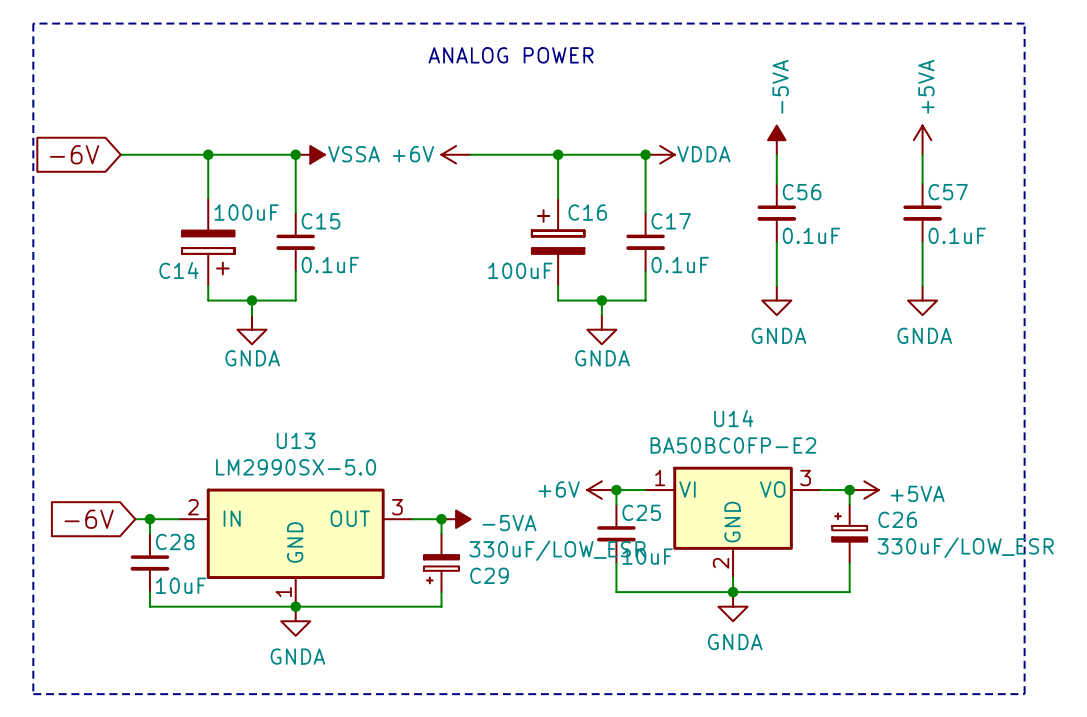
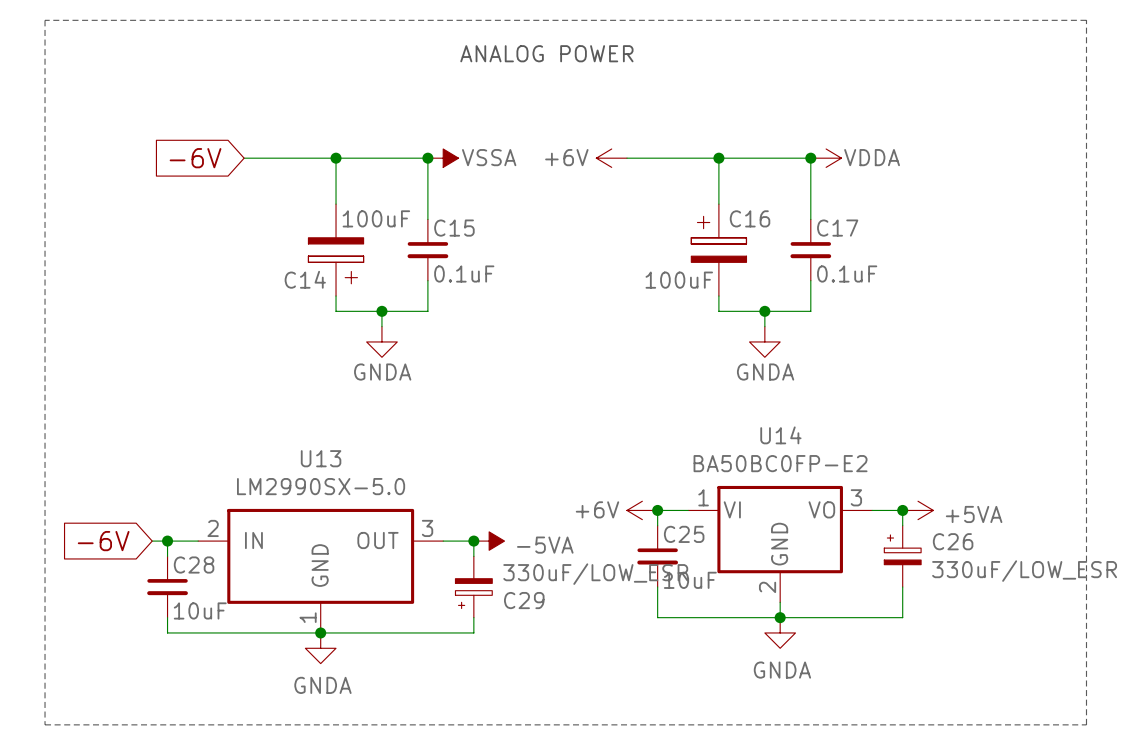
power symbol: -5VA (776, 140) -> none
power symbol: +5VA (922, 140) -> none
global label position: -6V (74, 154) -> -6V (195, 158)
wire: (120, 154) (222, 154) -> none
wire: (208, 154) (208, 198) -> (336, 158) (336, 204)
junction: (208, 154) -> none
wire: (295, 154) (295, 213) -> (320, 158) (427, 158) (427, 219)
junction position: (295, 154) -> (336, 158)
power symbol position: VSSA (310, 154) -> VSSA (443, 158)
junction: none -> (427, 158)
power symbol position: +6V (456, 154) -> +6V (611, 158)
wire: (470, 154) (587, 154) -> none
wire: (558, 154) (558, 198) -> (718, 158) (718, 204)
junction: (558, 154) -> none
wire: (645, 154) (645, 213) -> (688, 158) (810, 158) (810, 219)
junction position: (645, 154) -> (718, 158)
power symbol position: VDDA (660, 154) -> VDDA (826, 158)
junction: none -> (810, 158)
wire: (776, 154) (776, 183) -> none
wire: (922, 154) (922, 183) -> none
C56: 0.1uF (776, 213) -> none
C57: 0.1uF (922, 213) -> none
C14 position: (208, 242) -> (336, 250)
C15 position: (295, 242) -> (427, 250)
C16 position: (558, 242) -> (718, 250)
C17 position: (645, 242) -> (810, 250)
wire: (776, 242) (776, 285) -> none
wire: (922, 242) (922, 285) -> none
wire: (295, 271) (295, 300) (208, 300) (208, 285) -> (427, 280) (427, 311) (336, 311) (336, 296)
wire: (645, 271) (645, 300) (558, 300) (558, 285) -> (810, 280) (810, 311) (718, 311) (718, 296)
wire: (251, 300) (251, 315) -> (381, 311) (381, 326)
junction: (251, 300) -> none
junction: none -> (381, 311)
wire: (601, 300) (601, 315) -> (764, 311) (764, 326)
junction: (601, 300) -> none
junction: none -> (764, 311)
power symbol: GNDA (776, 300) -> none
power symbol: GNDA (922, 300) -> none
power symbol position: GNDA (251, 329) -> GNDA (381, 341)
power symbol: GNDA (601, 329) -> none
power symbol: none -> GNDA (764, 341)

